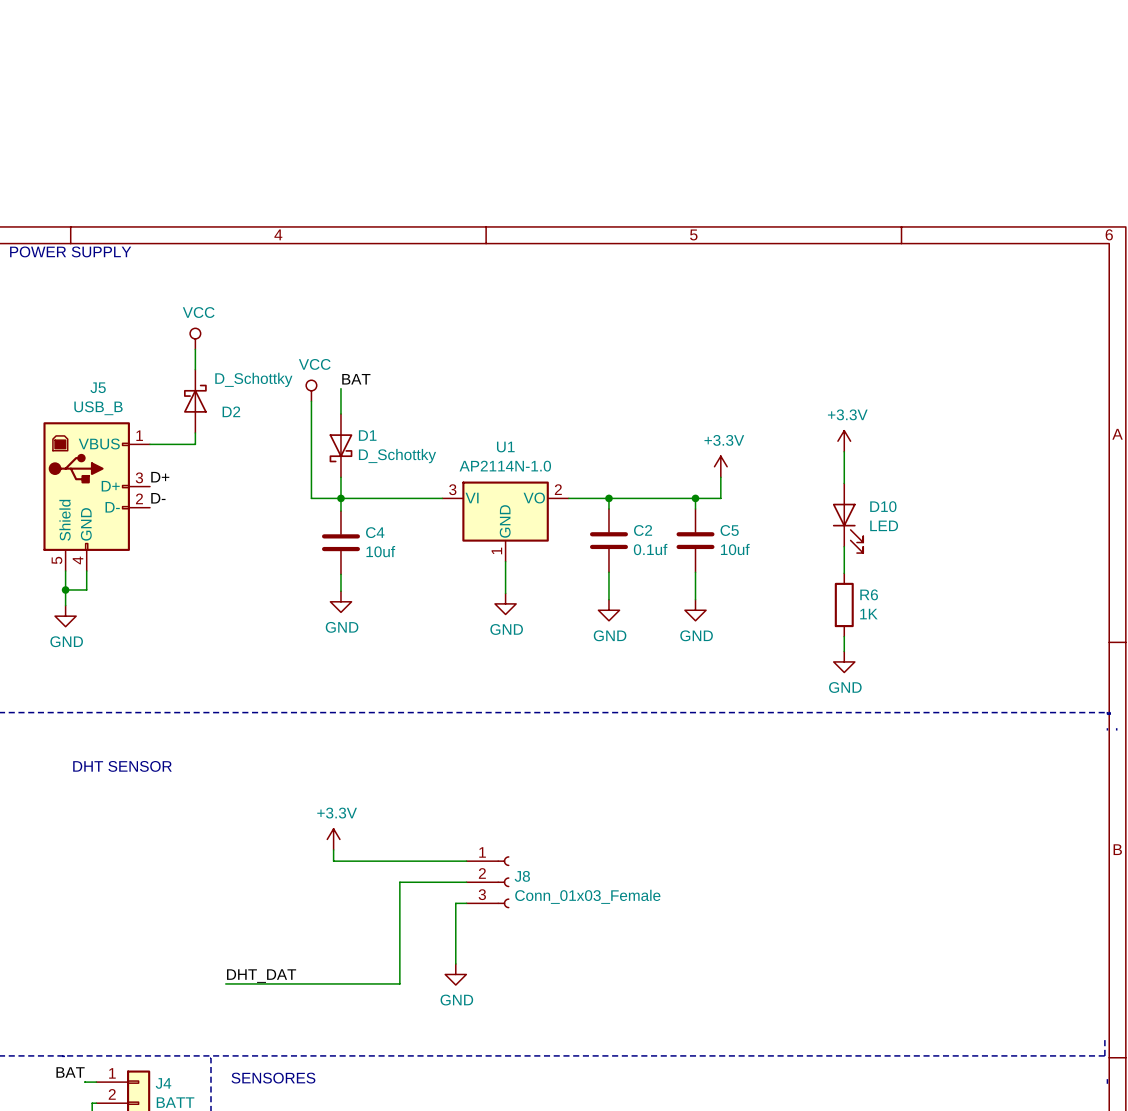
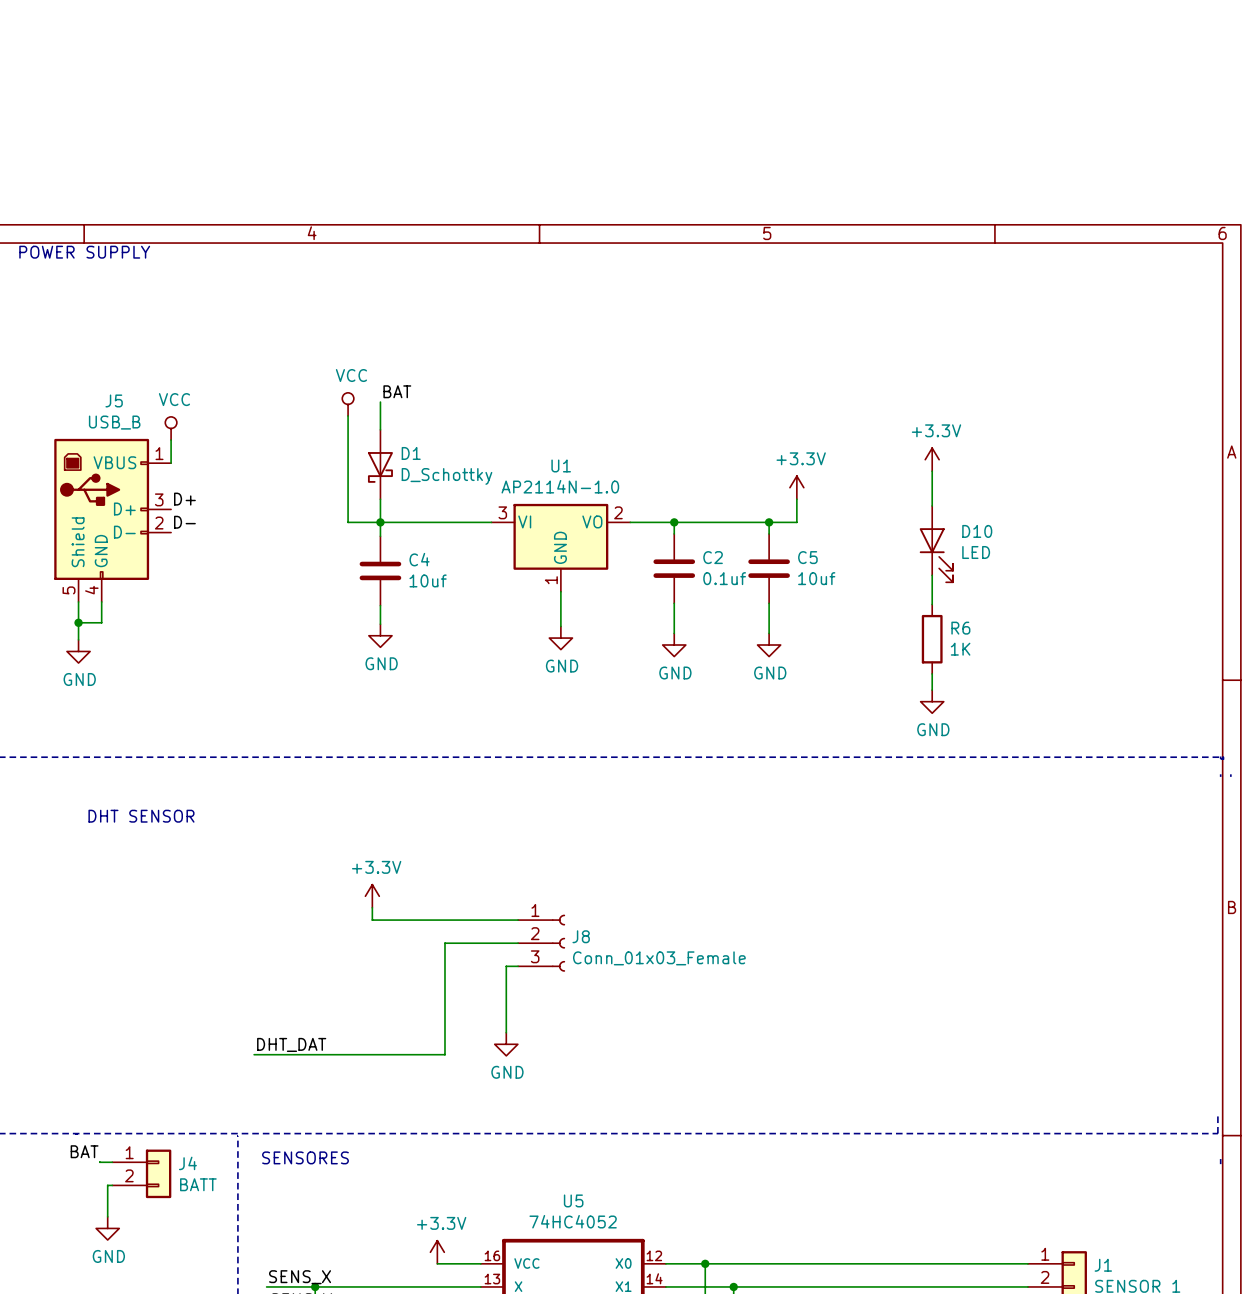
power symbol position: VCC (195, 338) -> VCC (171, 428)
wire: (195, 349) (195, 369) -> none
D2: D_Schottky (195, 401) -> none
wire: (195, 432) (195, 444) (150, 444) -> (171, 440) (171, 463)

